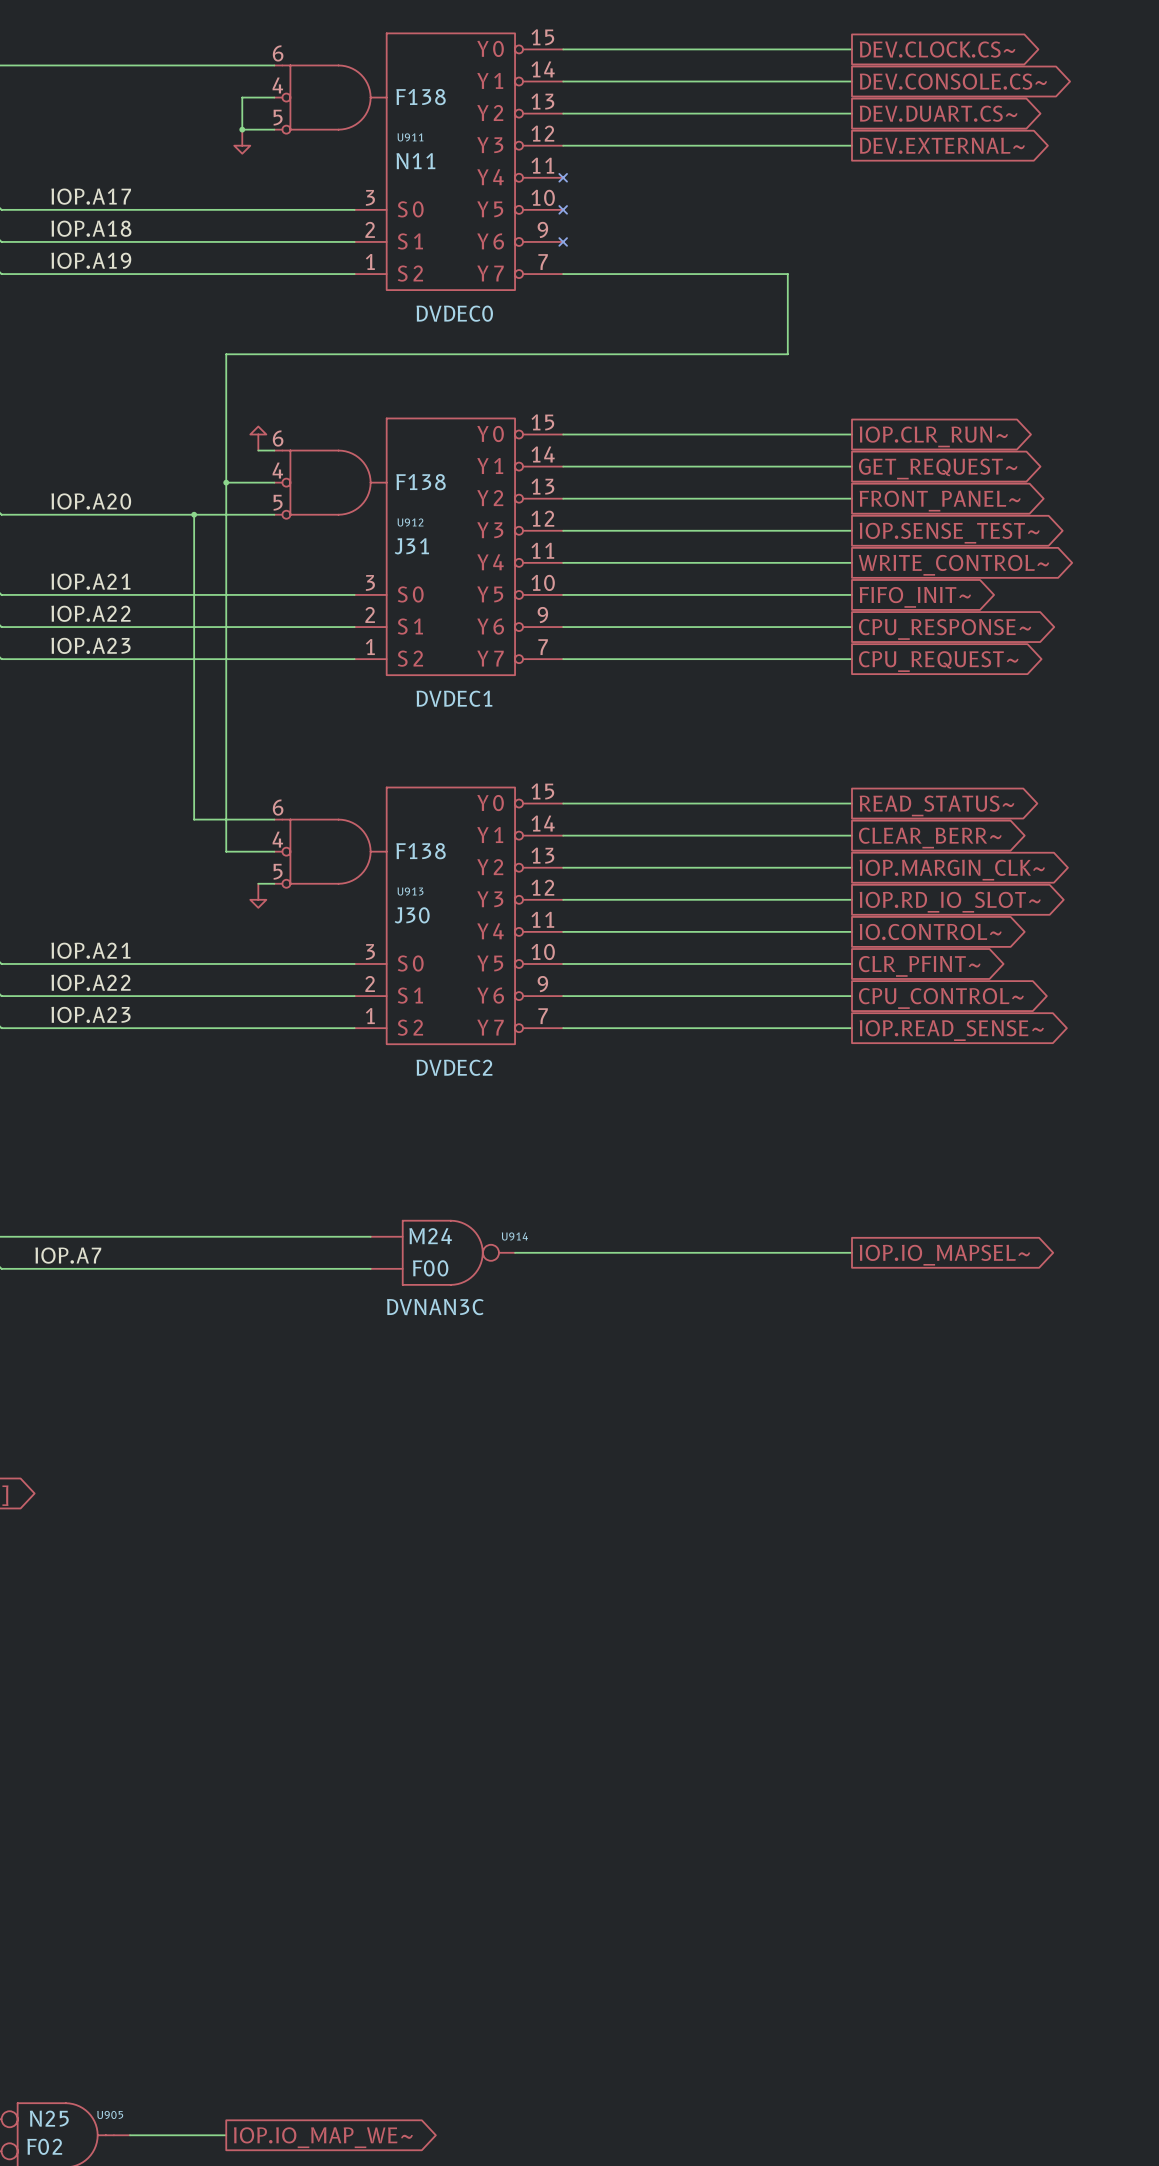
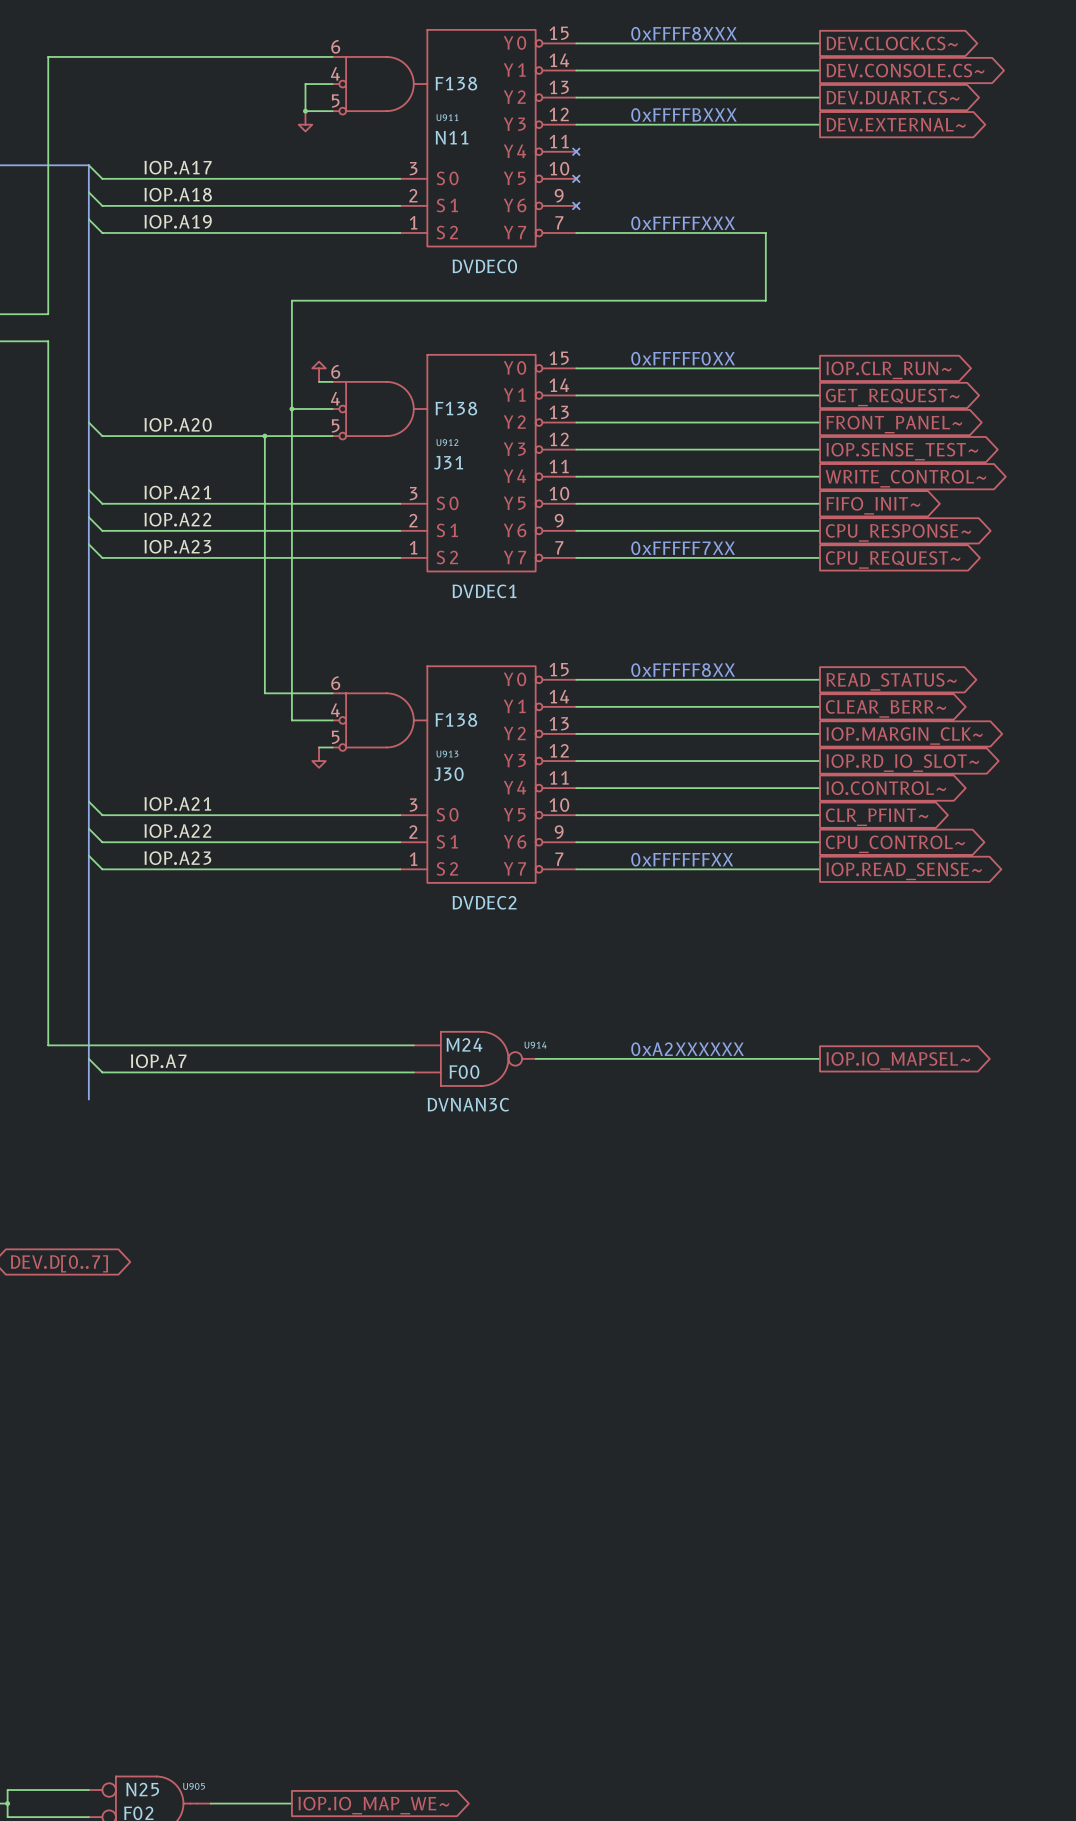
text: none -> 0xFFFF8XXX (683, 33)
text: none -> 0xFFFFBXXX (683, 114)
text: none -> 0xFFFFFXXX (683, 223)
text: none -> 0xFFFFF0XX (683, 358)
text: none -> 0xFFFFF7XX (683, 548)
text: none -> 0xFFFFF8XX (683, 670)
text: none -> 0xFFFFFFXX (682, 859)
text: none -> 0xA2XXXXXX (687, 1049)

